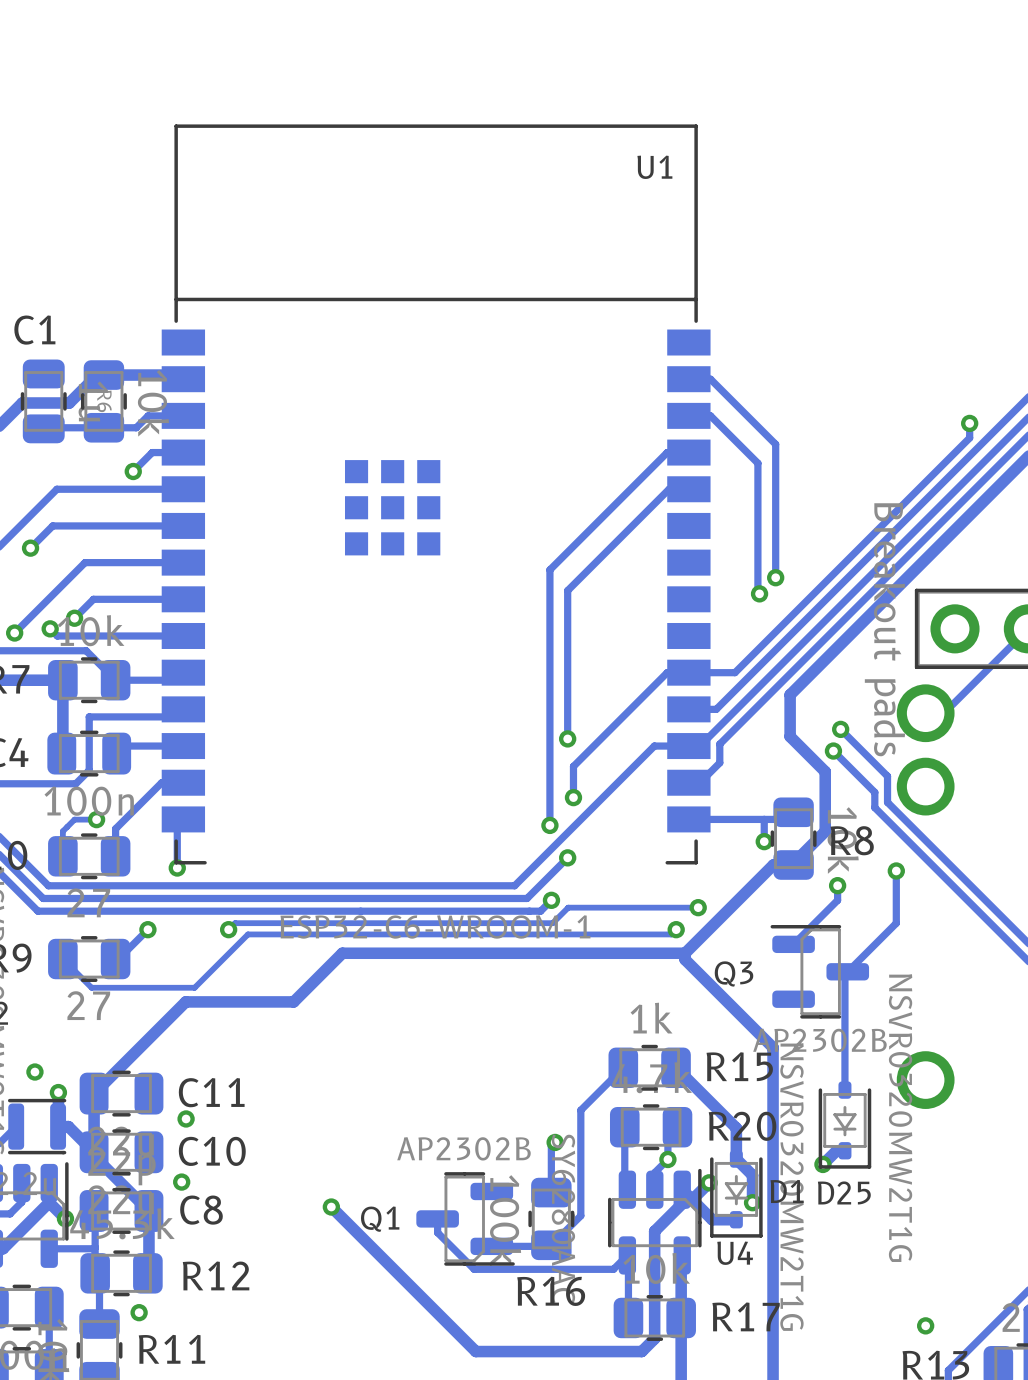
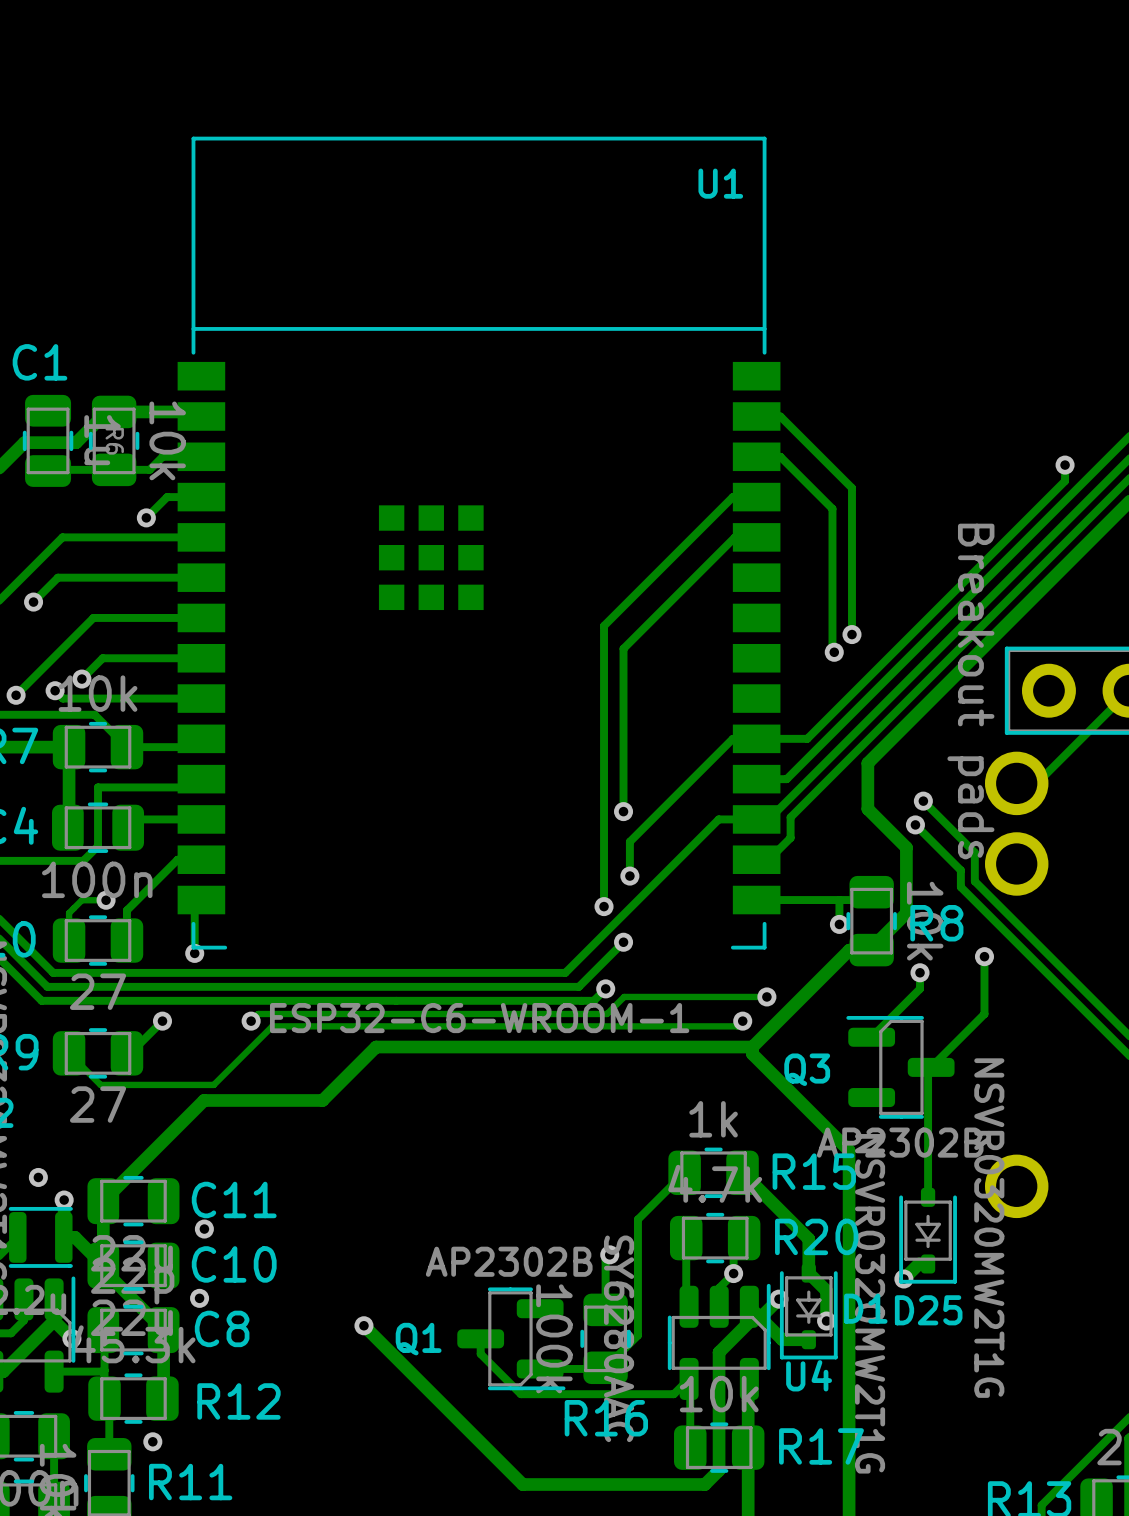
via: (925, 1325) -> none

